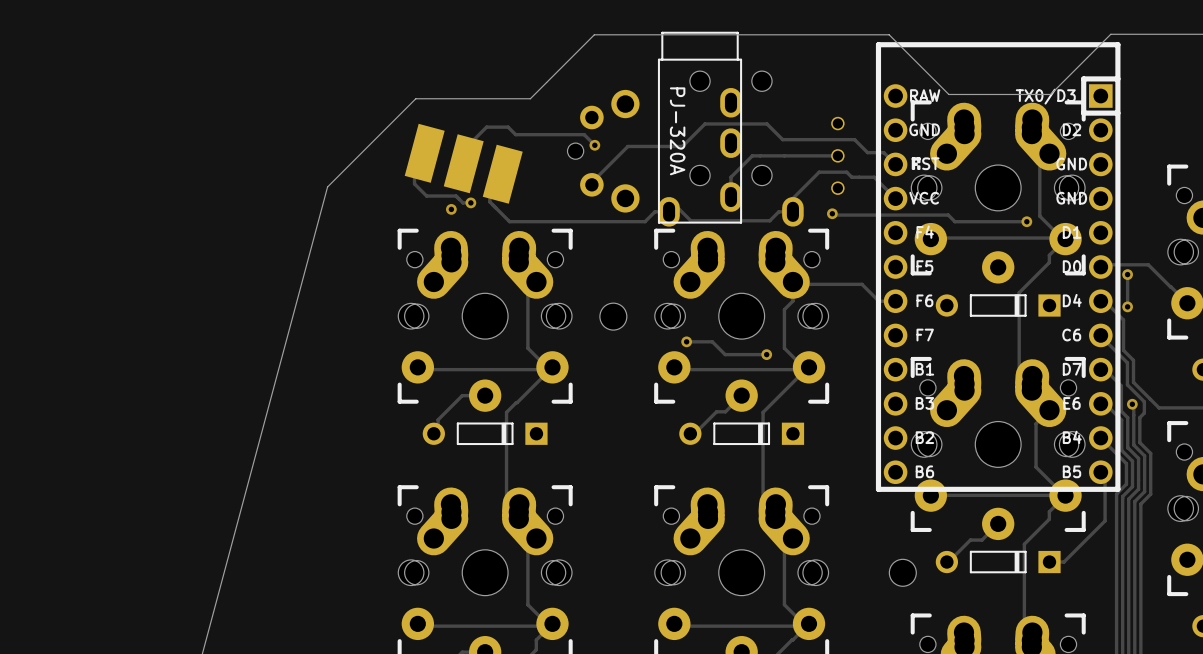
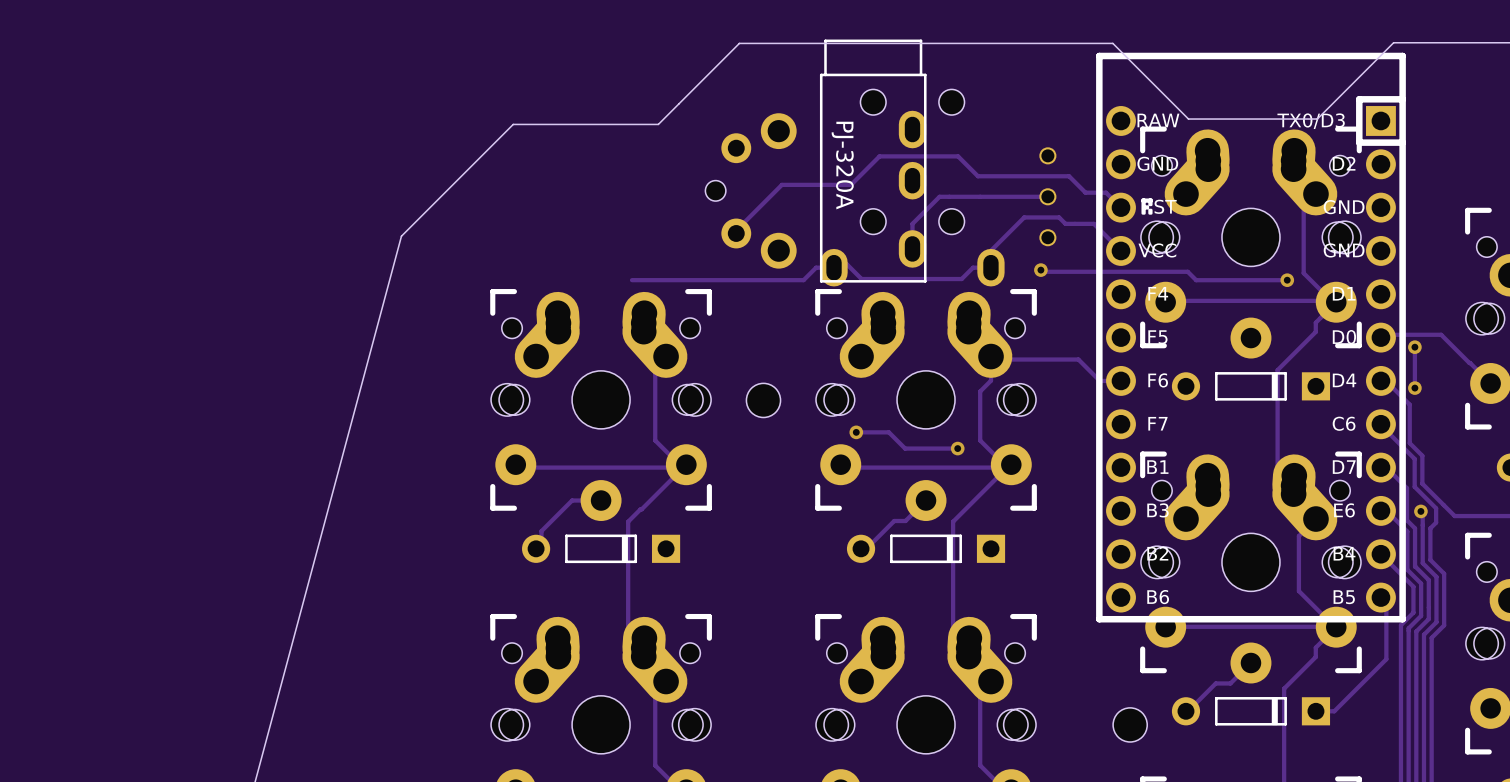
track: (594, 145) (584, 134) (515, 134) (508, 127) (486, 127) (467, 145) -> none
via: (594, 145) -> none
part: (463, 163) -> none
track: (419, 169) (414, 173) (414, 183) (426, 196) (456, 196) (462, 202) (470, 202) -> none
track: (489, 178) (489, 201) (509, 221) -> none
via: (470, 202) -> none
via: (451, 209) -> none

